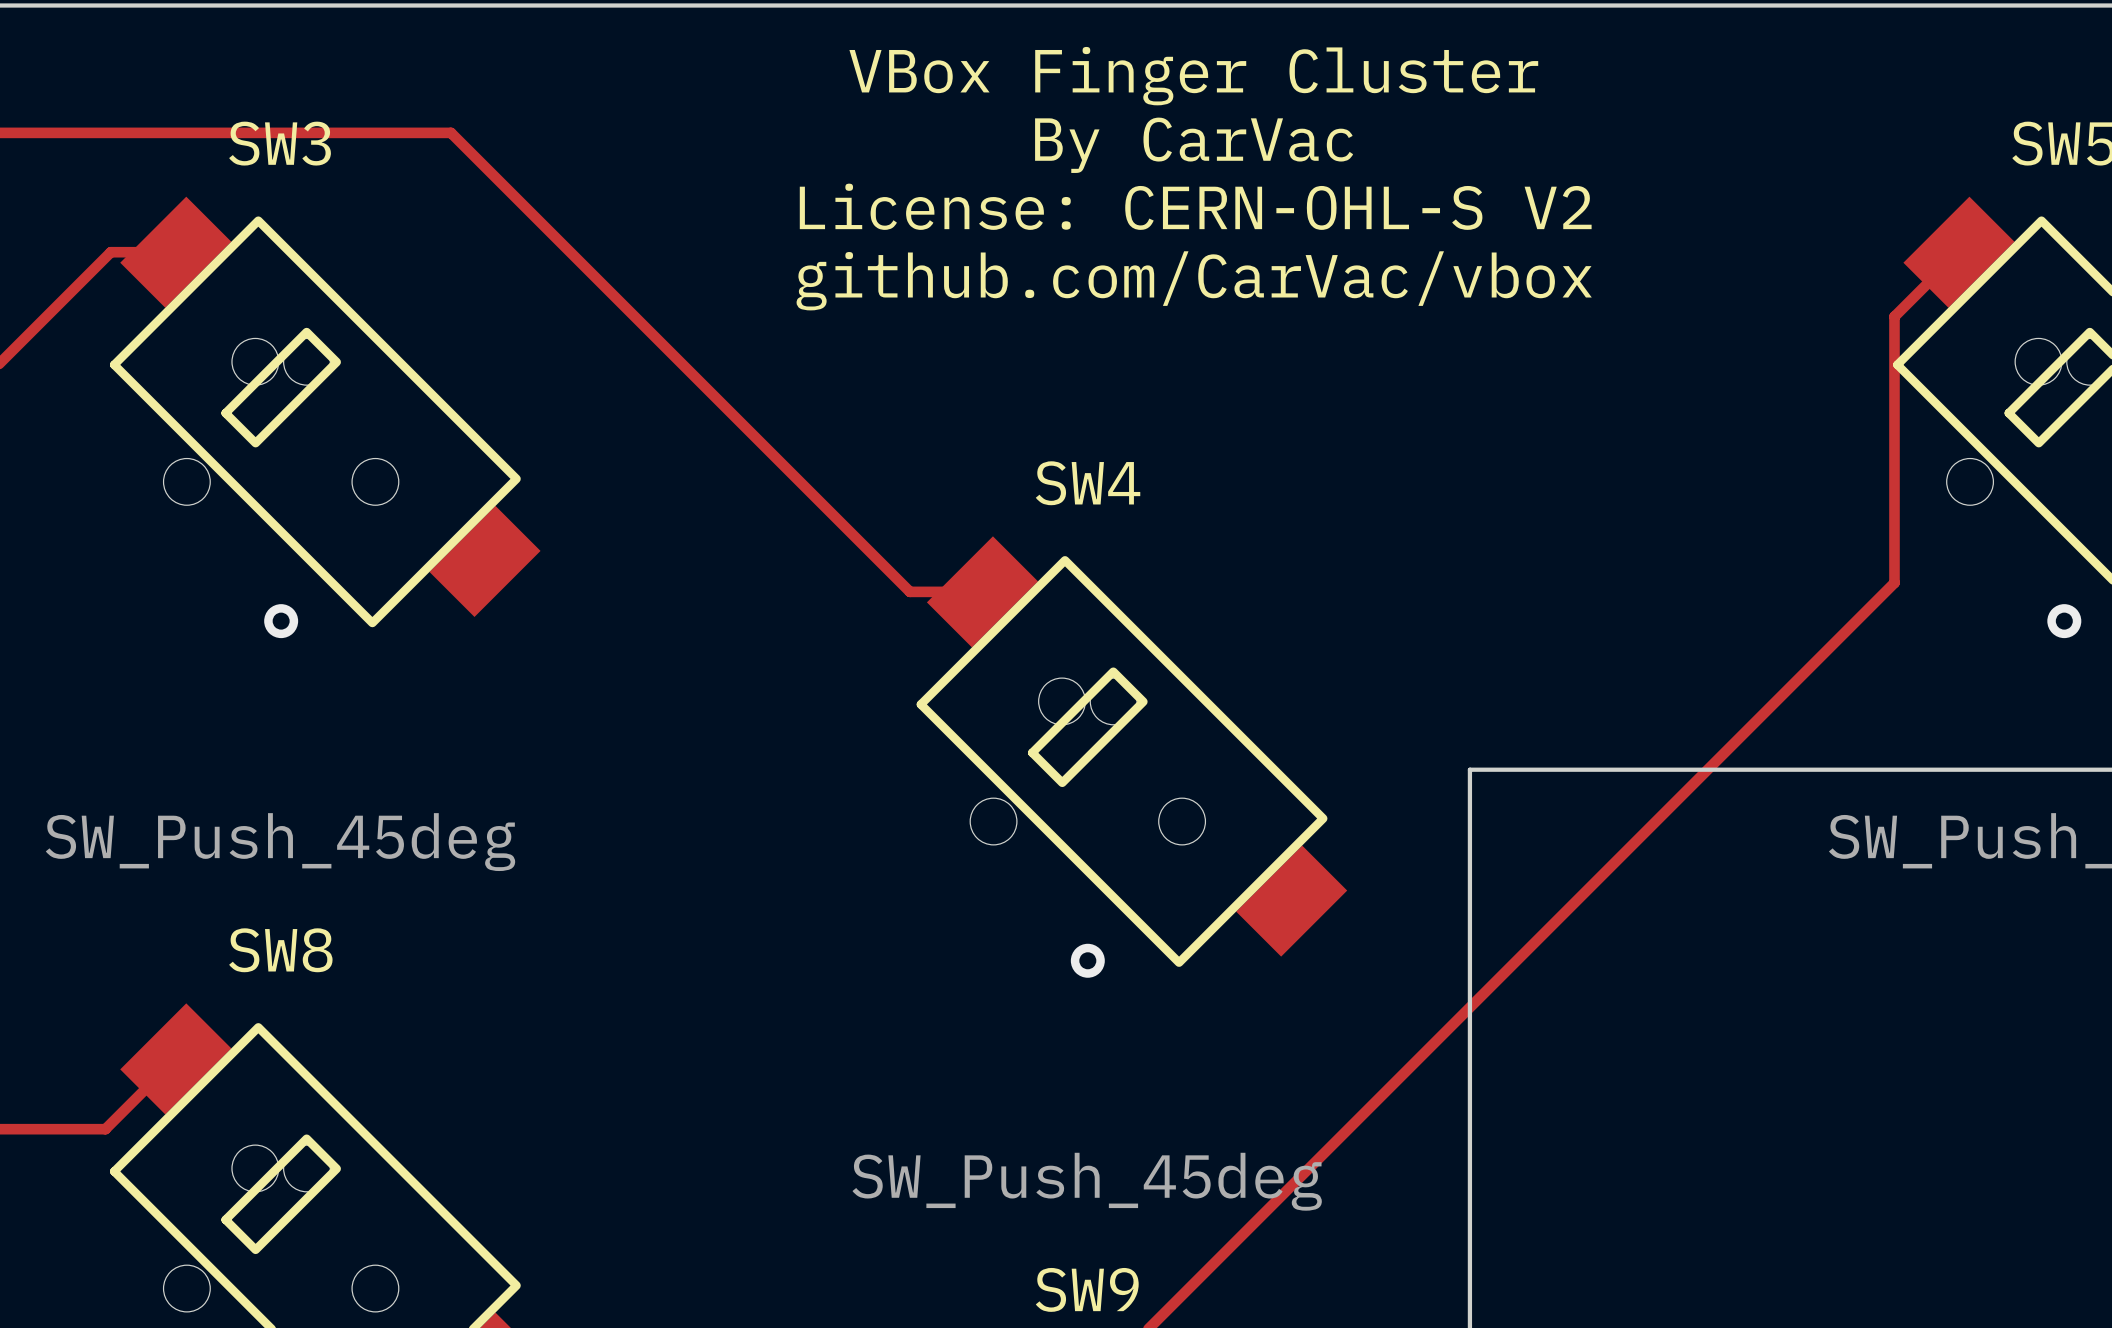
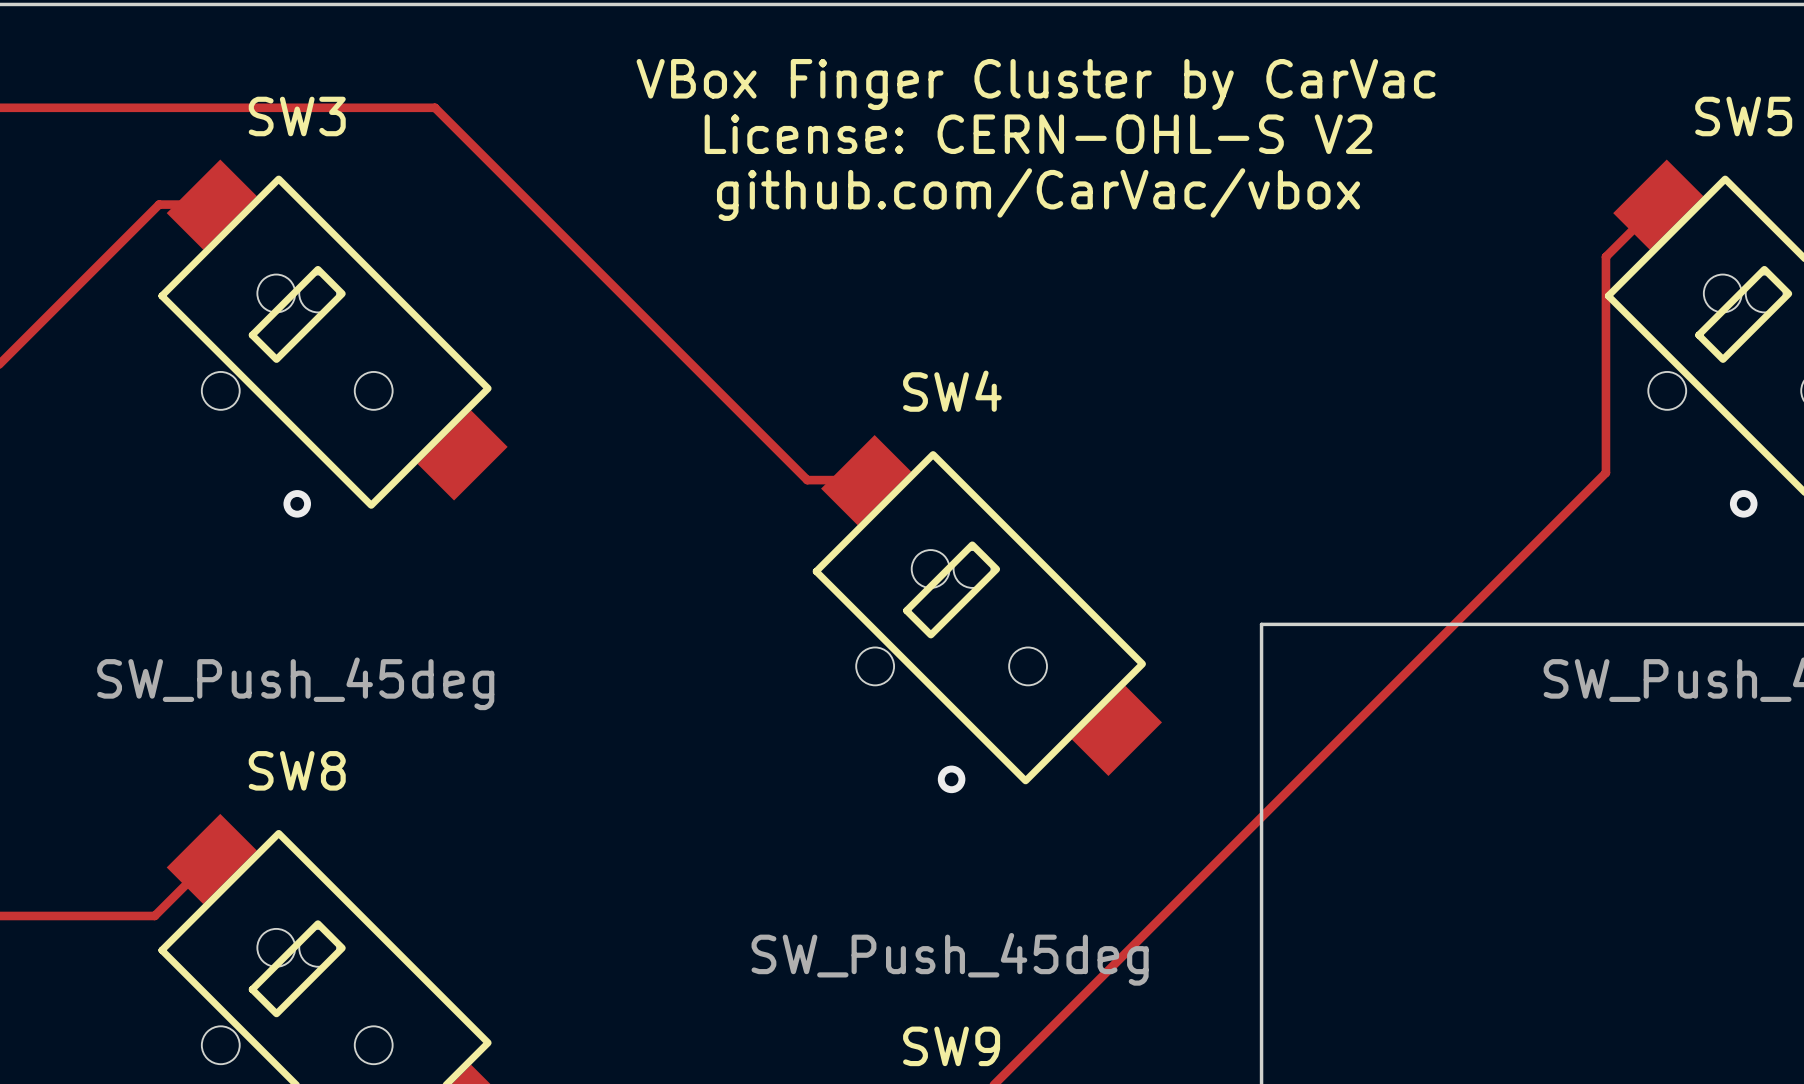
text: VBox Finger Cluster (1193, 76) -> VBox Finger Cluster by CarVac (1036, 84)
text: By CarVac (1194, 145) -> none
text position: License: CERN-OHL-S V2 (1195, 206) -> License: CERN-OHL-S V2 (1038, 134)
text position: github.com/CarVac/vbox (1194, 280) -> github.com/CarVac/vbox (1038, 194)

